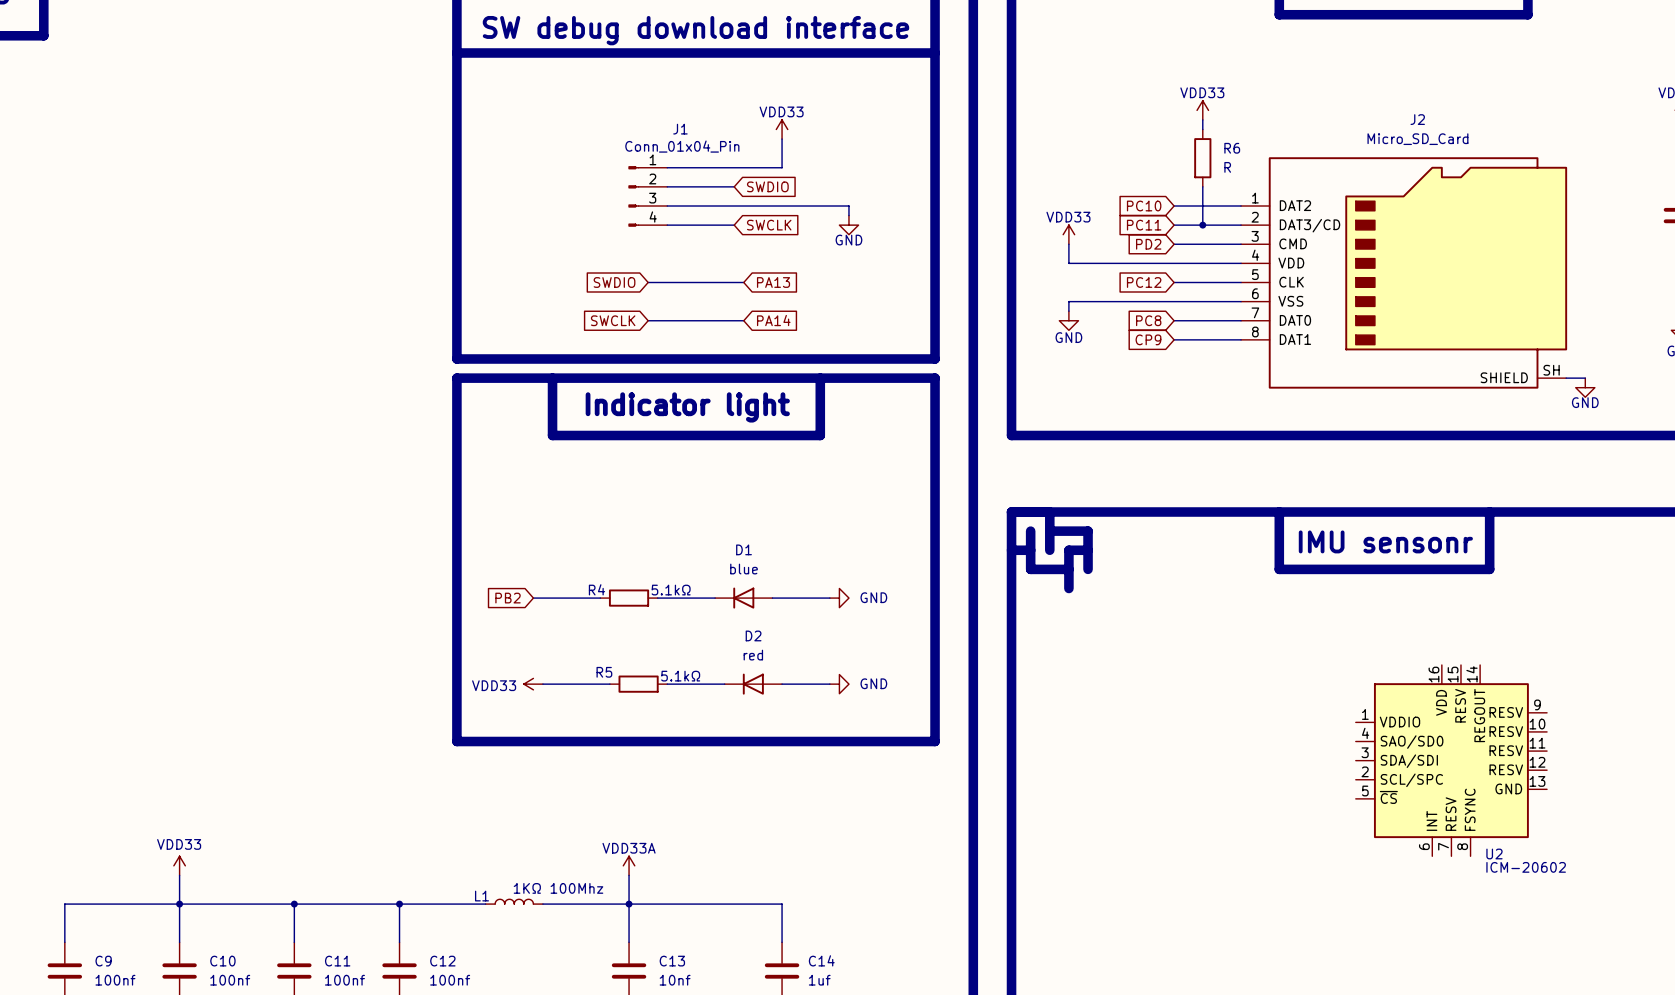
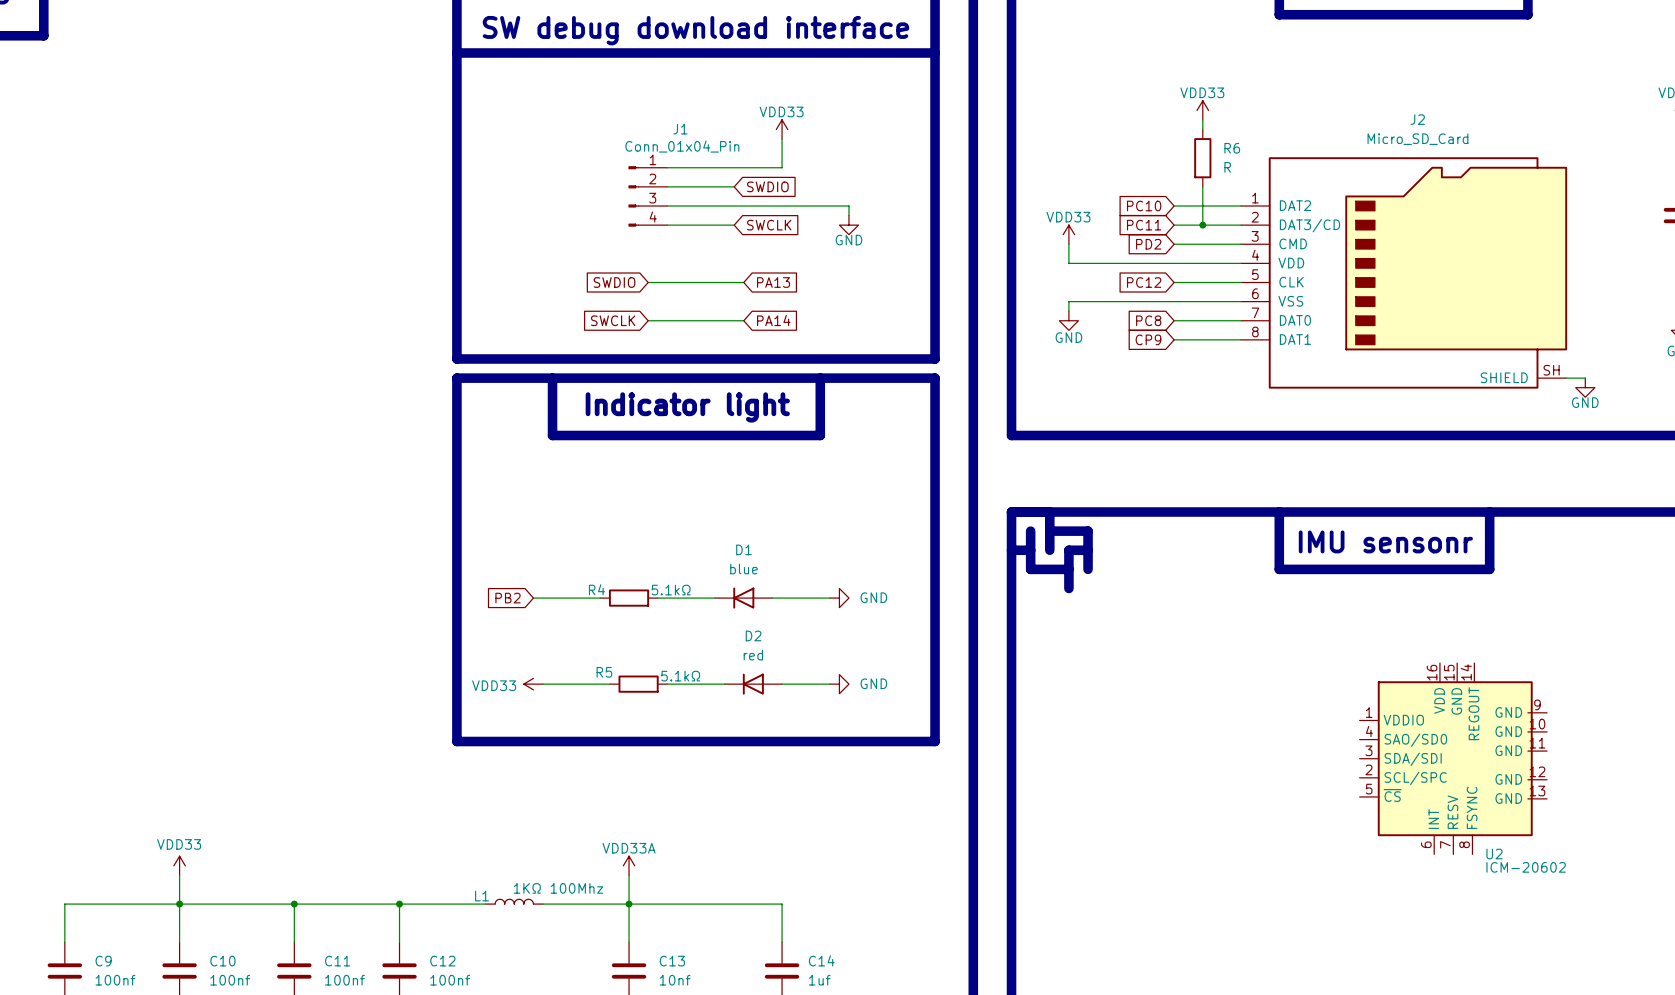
U2 symbol: [1355, 665, 1548, 857] -> [1359, 663, 1548, 855]

